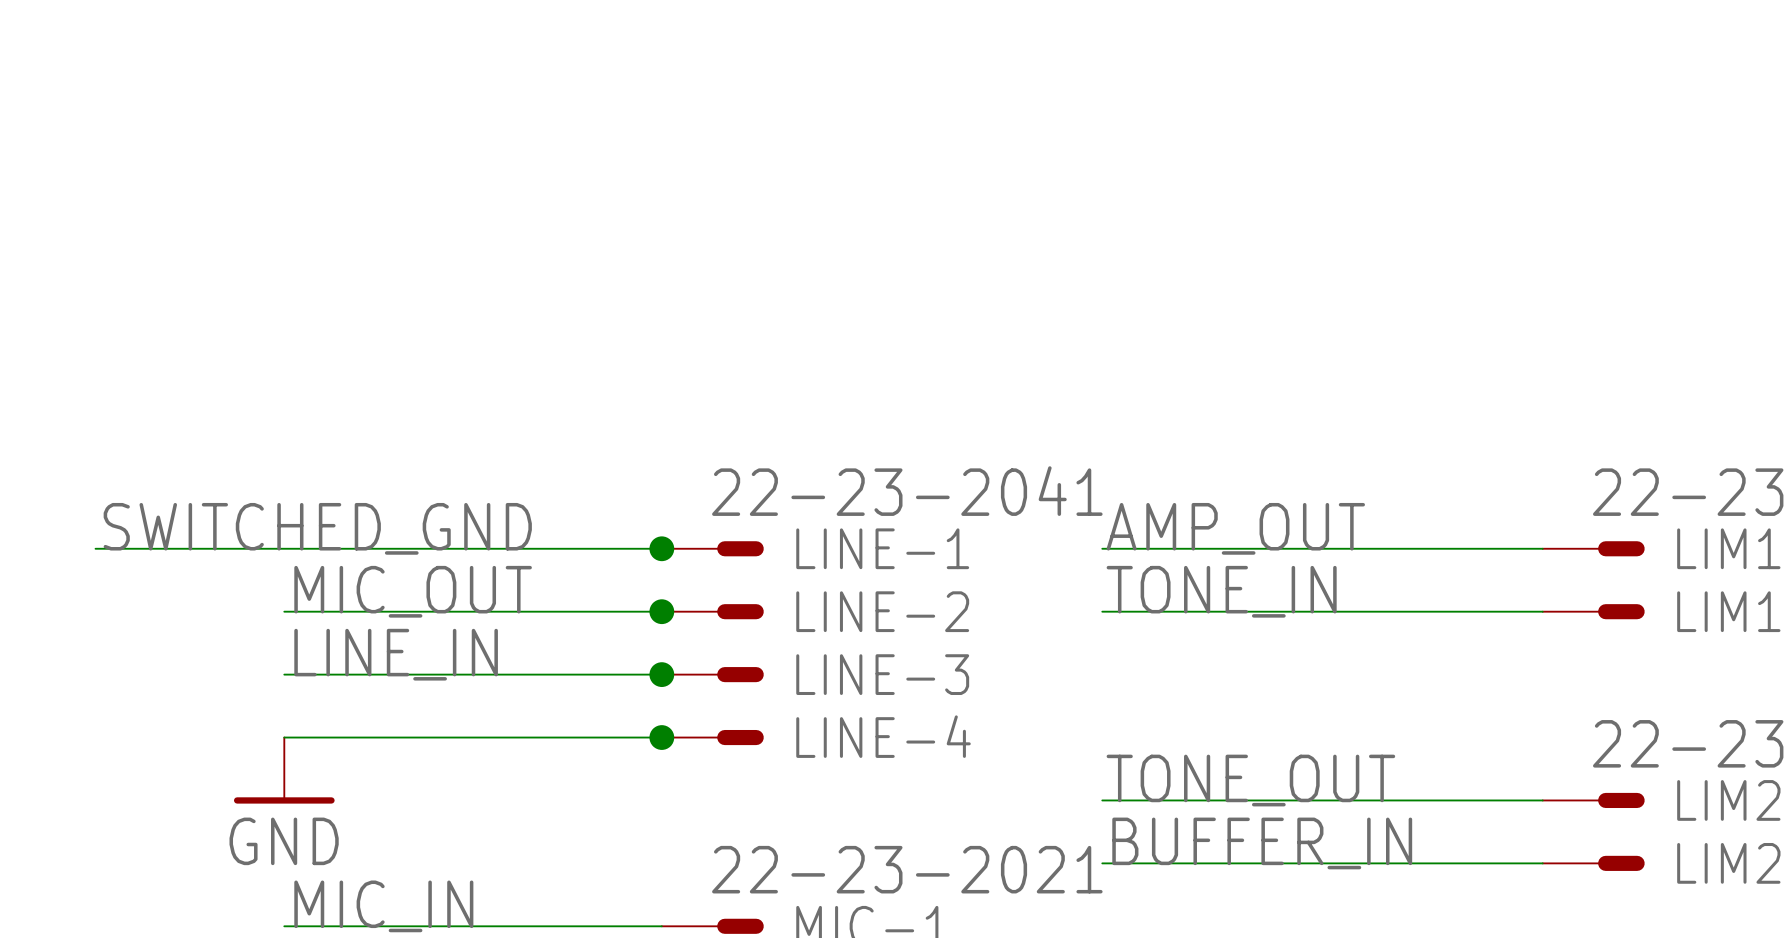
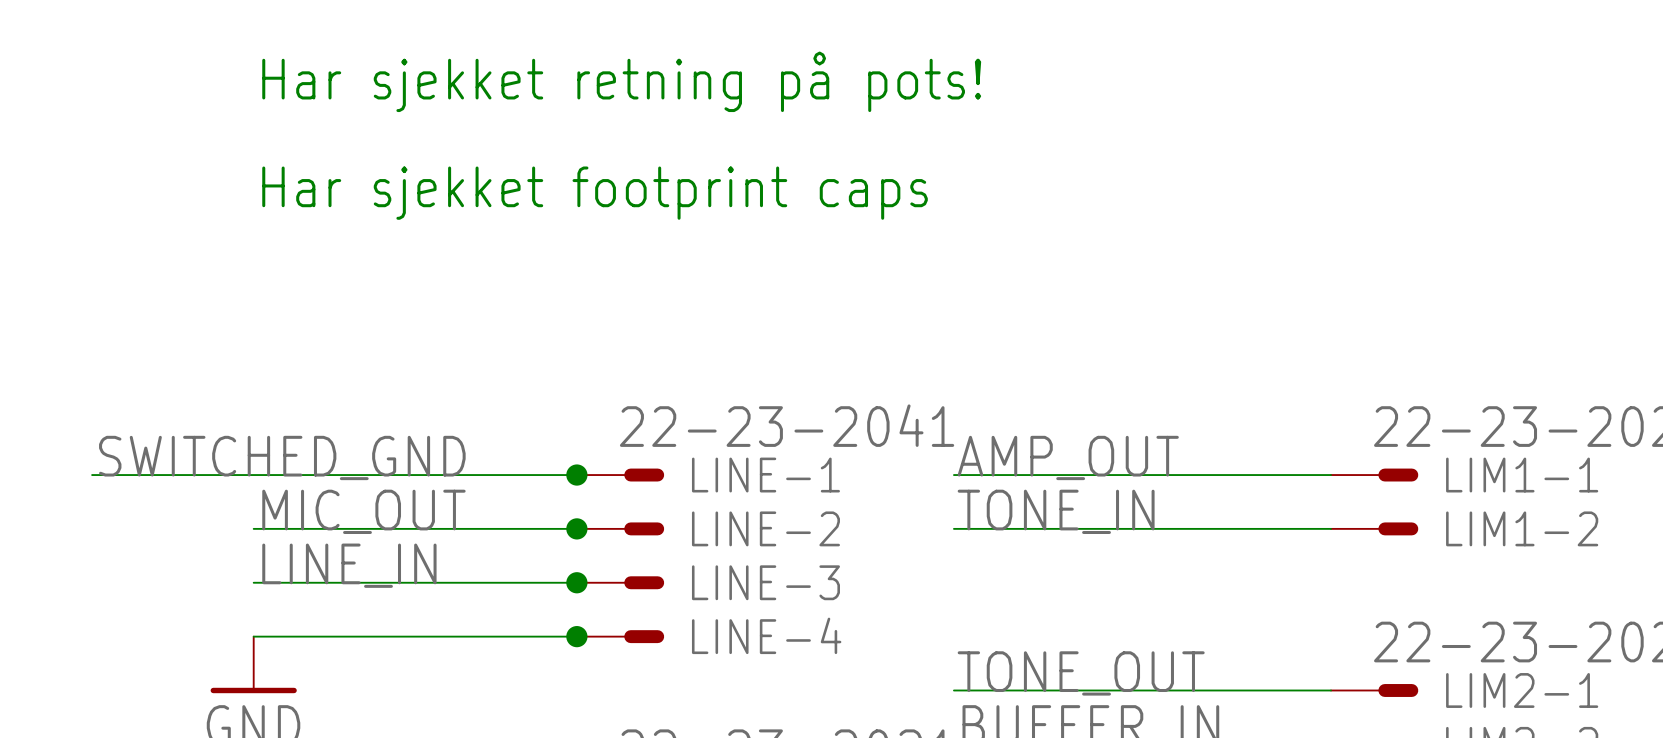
text: none -> Har sjekket retning på pots! (621, 81)
text: none -> Har sjekket footprint caps (595, 193)

